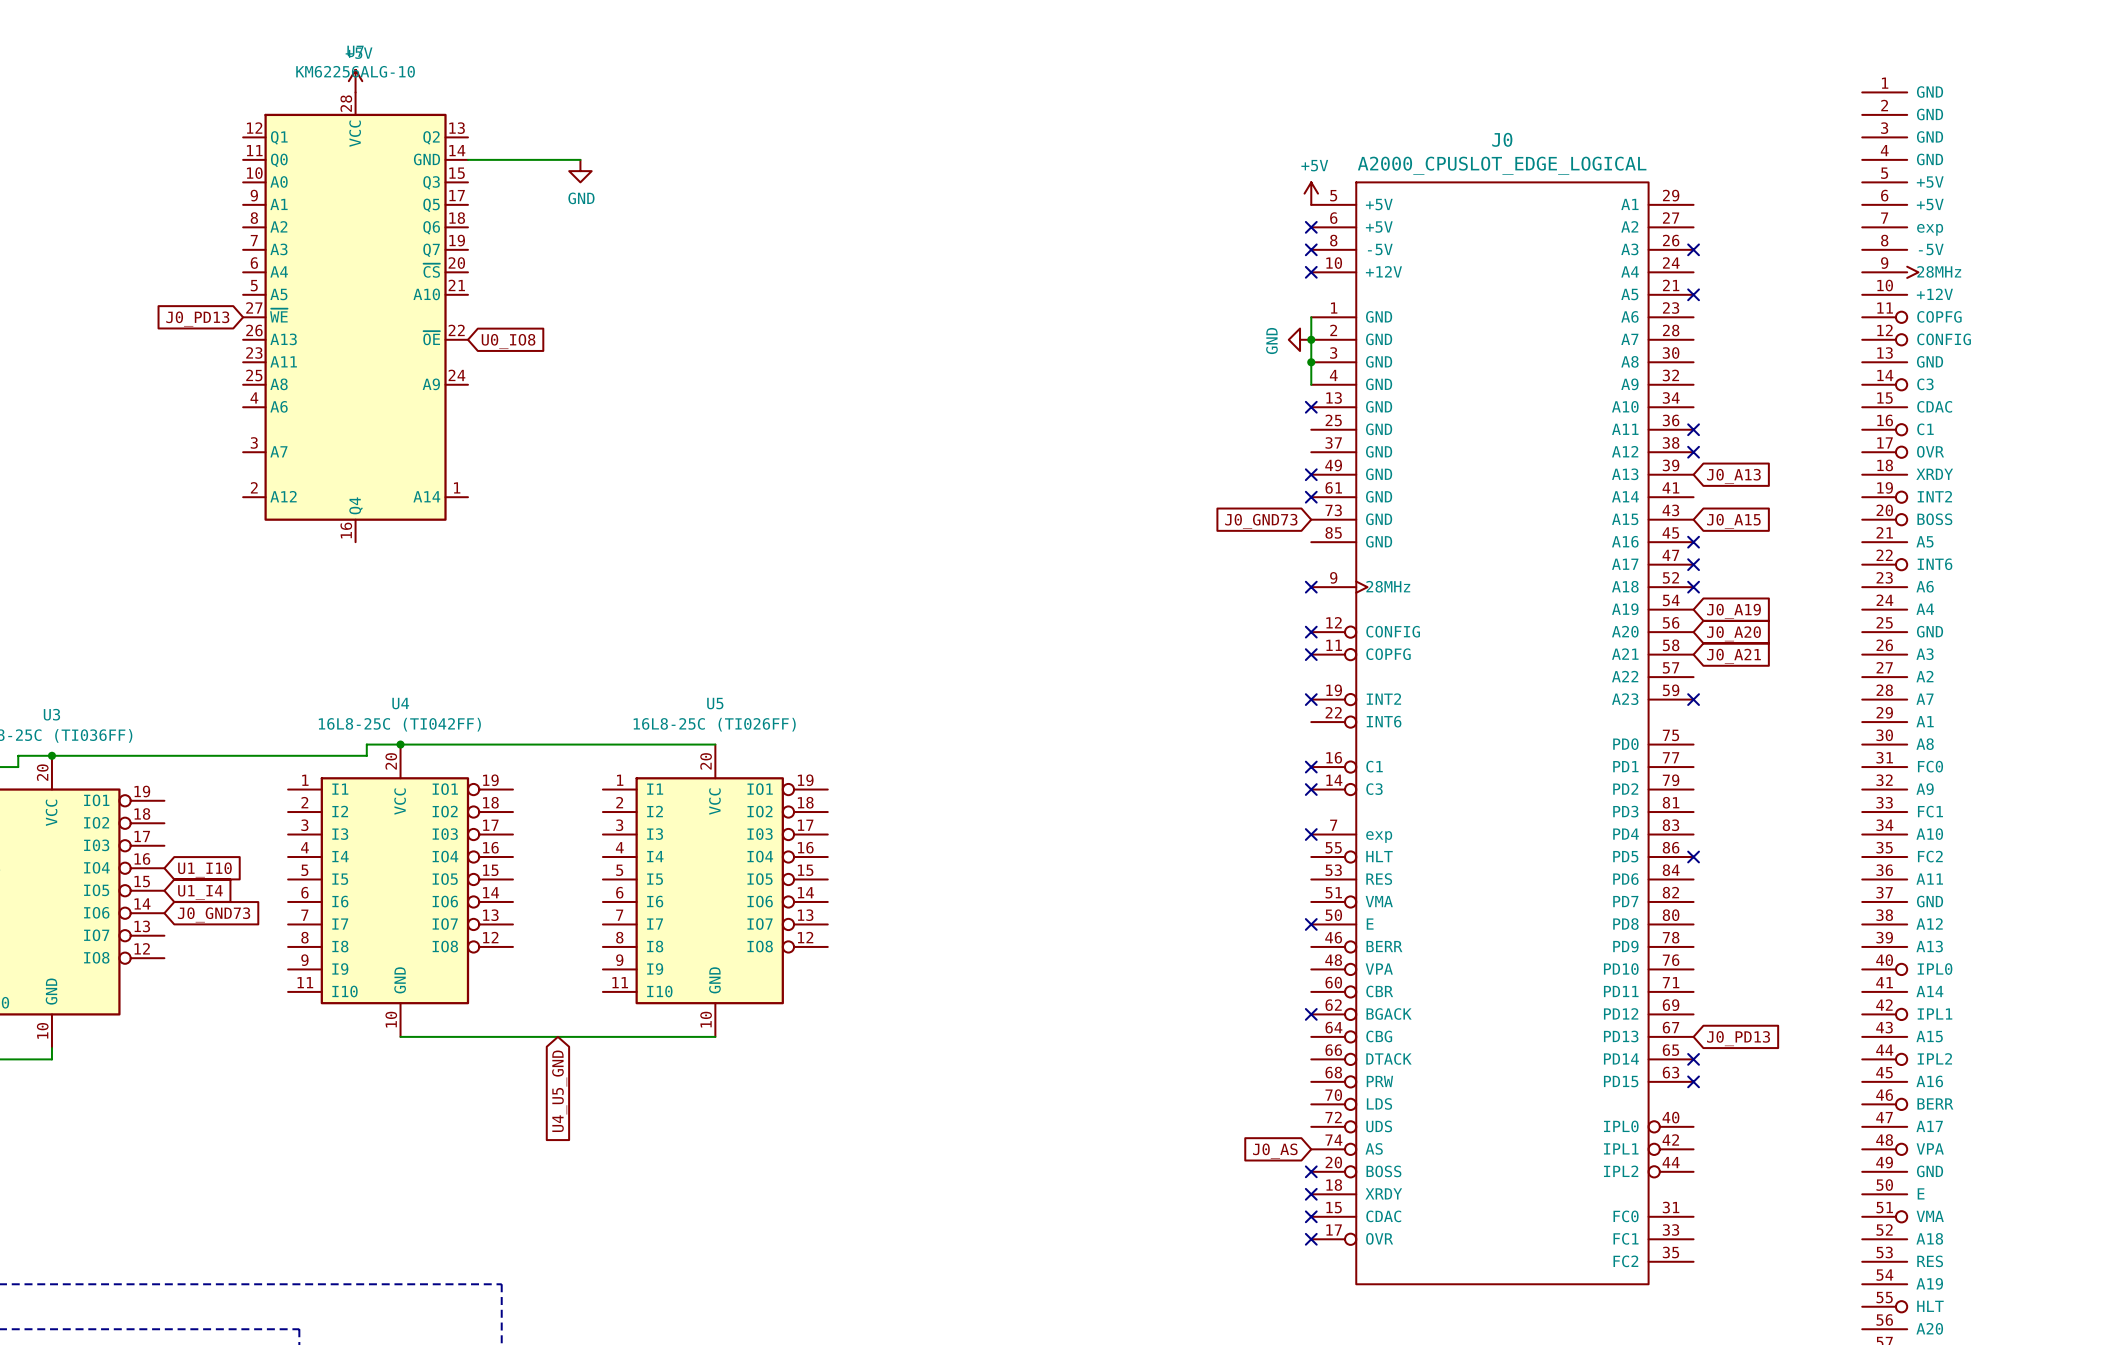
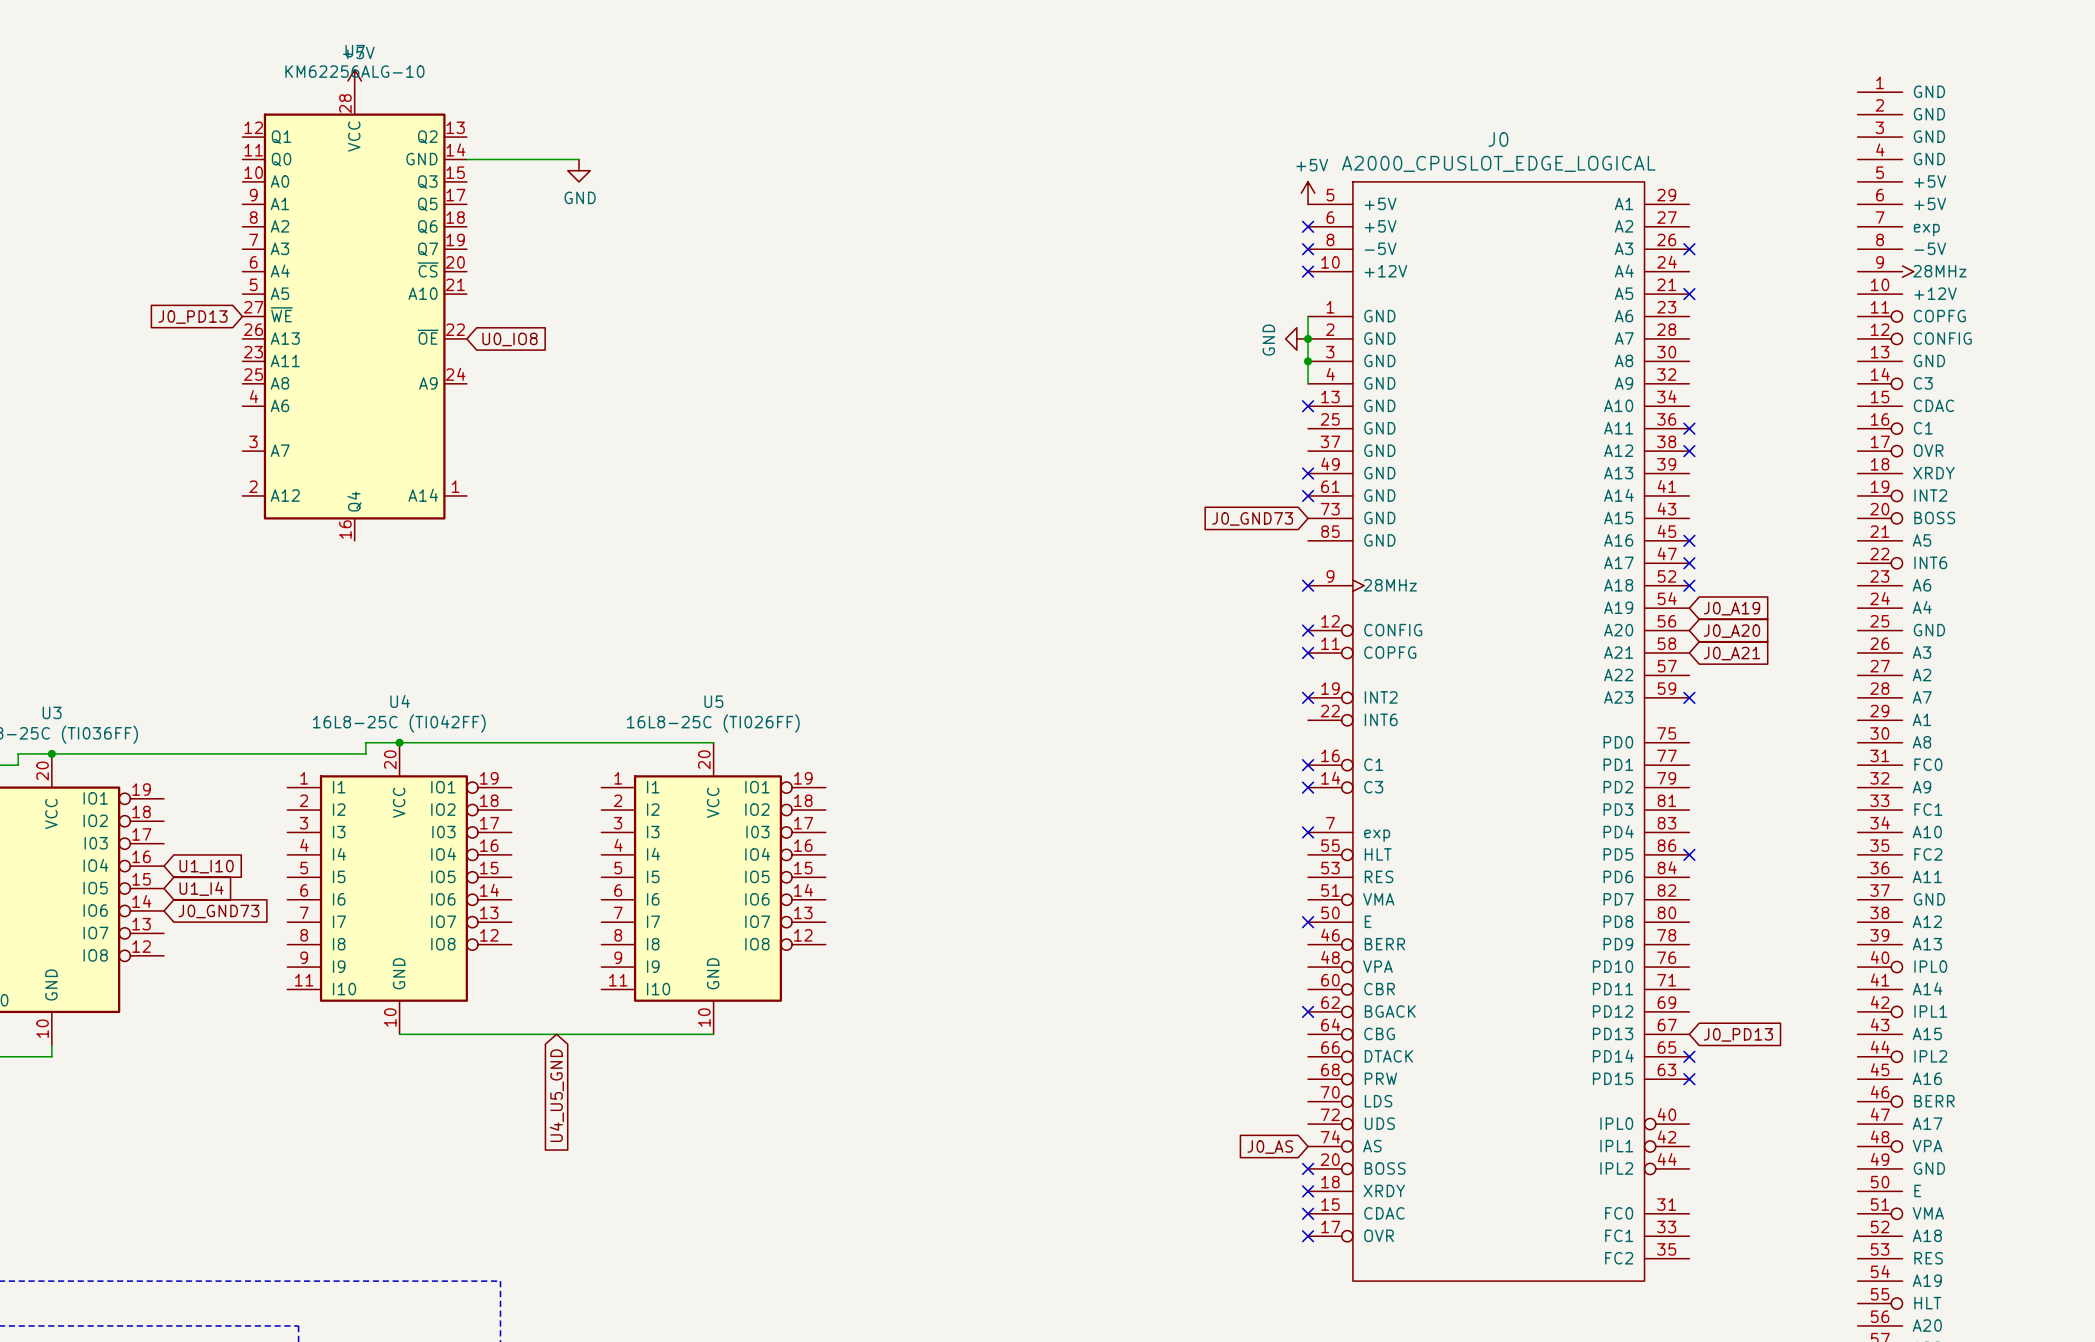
global label: J0_A13 (1733, 476) -> none
global label: J0_A15 (1733, 521) -> none

